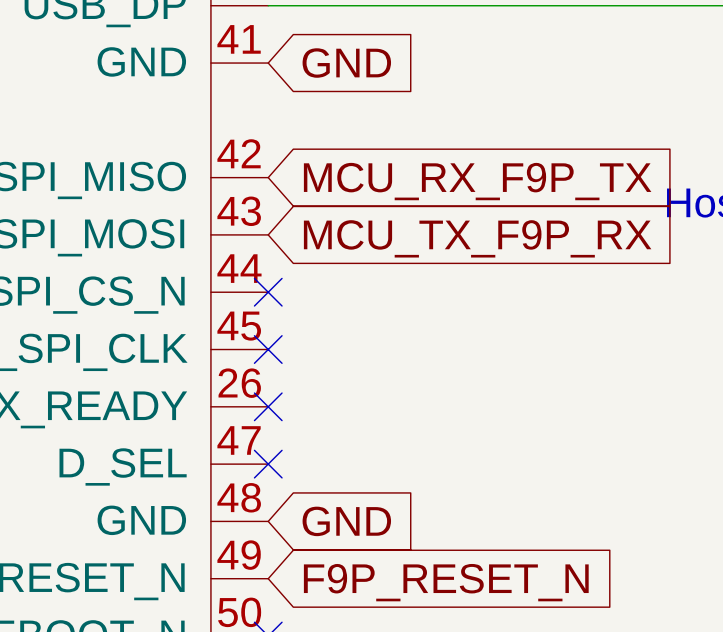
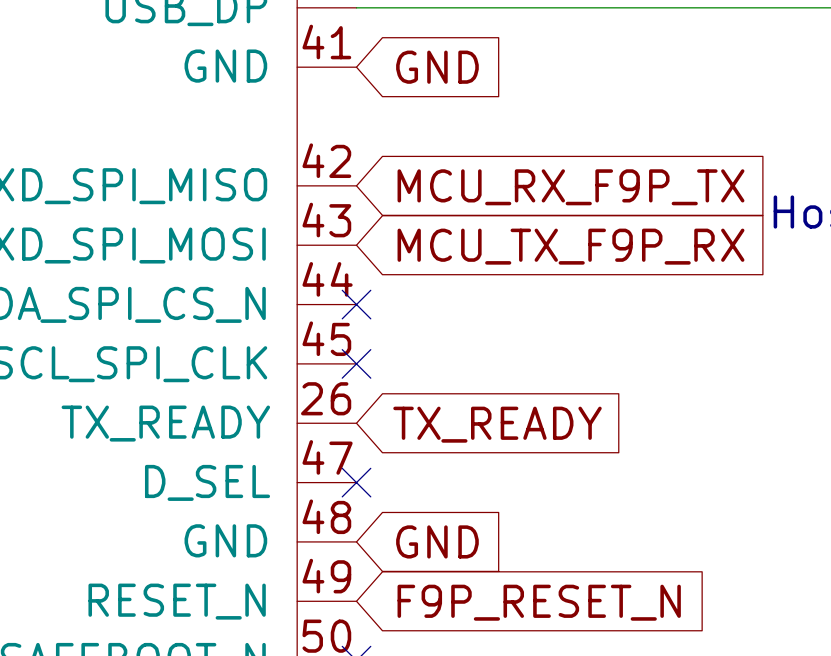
no-connect mark: (268, 406) -> none
global label: none -> TX_READY (497, 424)

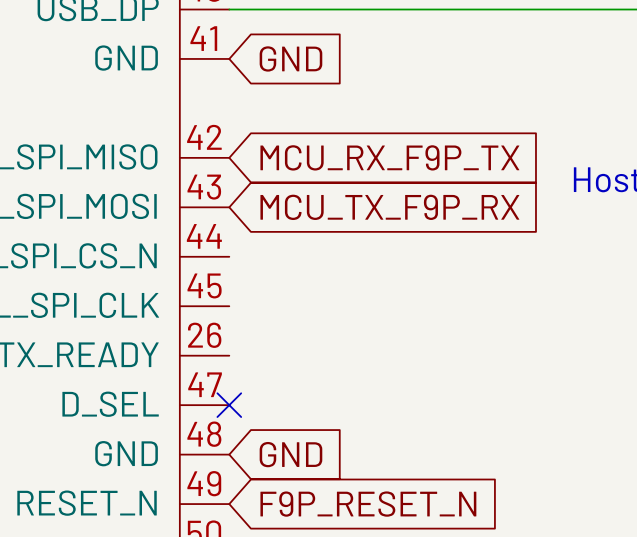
no-connect mark: (356, 304) -> none
no-connect mark: (356, 363) -> none
global label: TX_READY (497, 424) -> none

